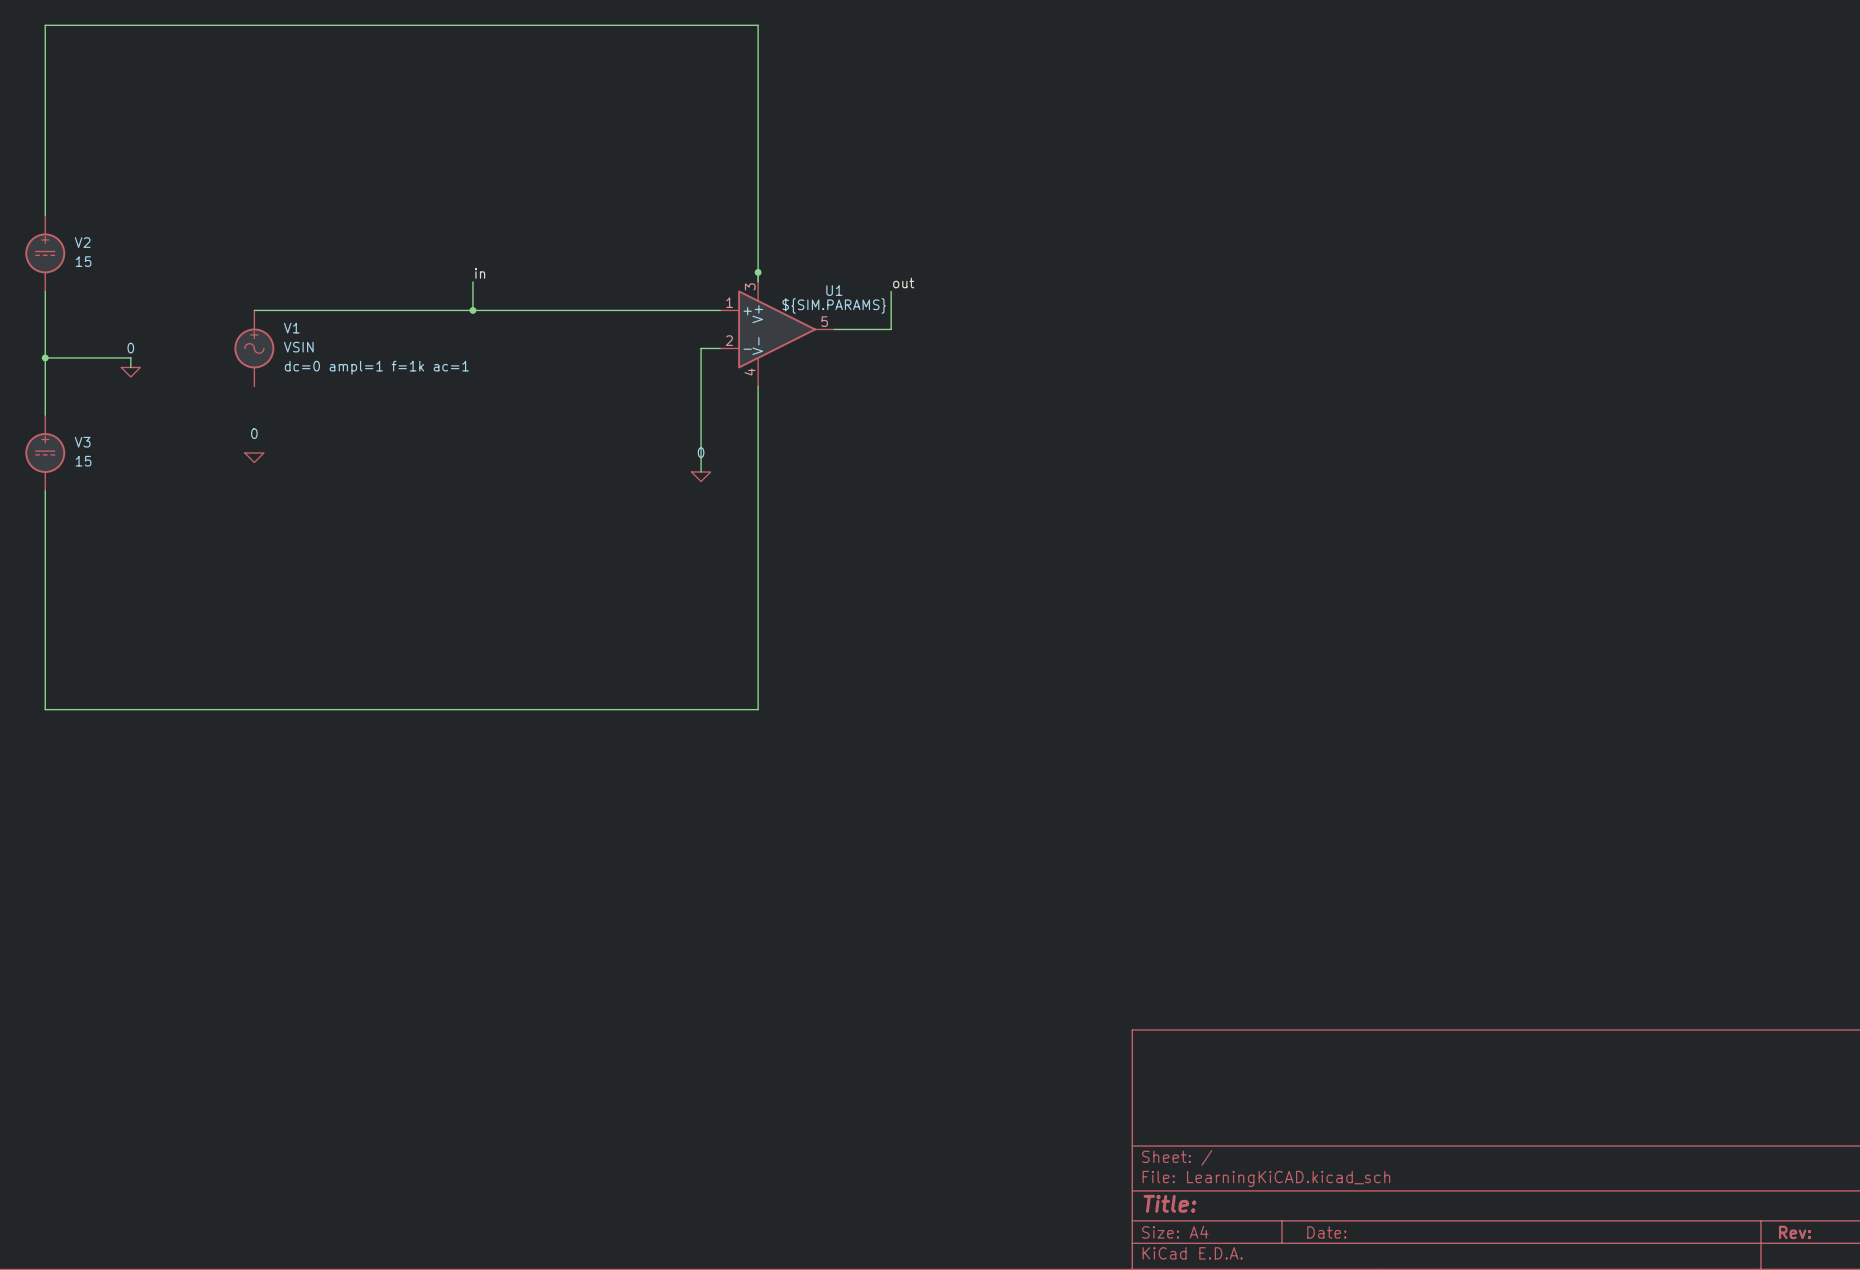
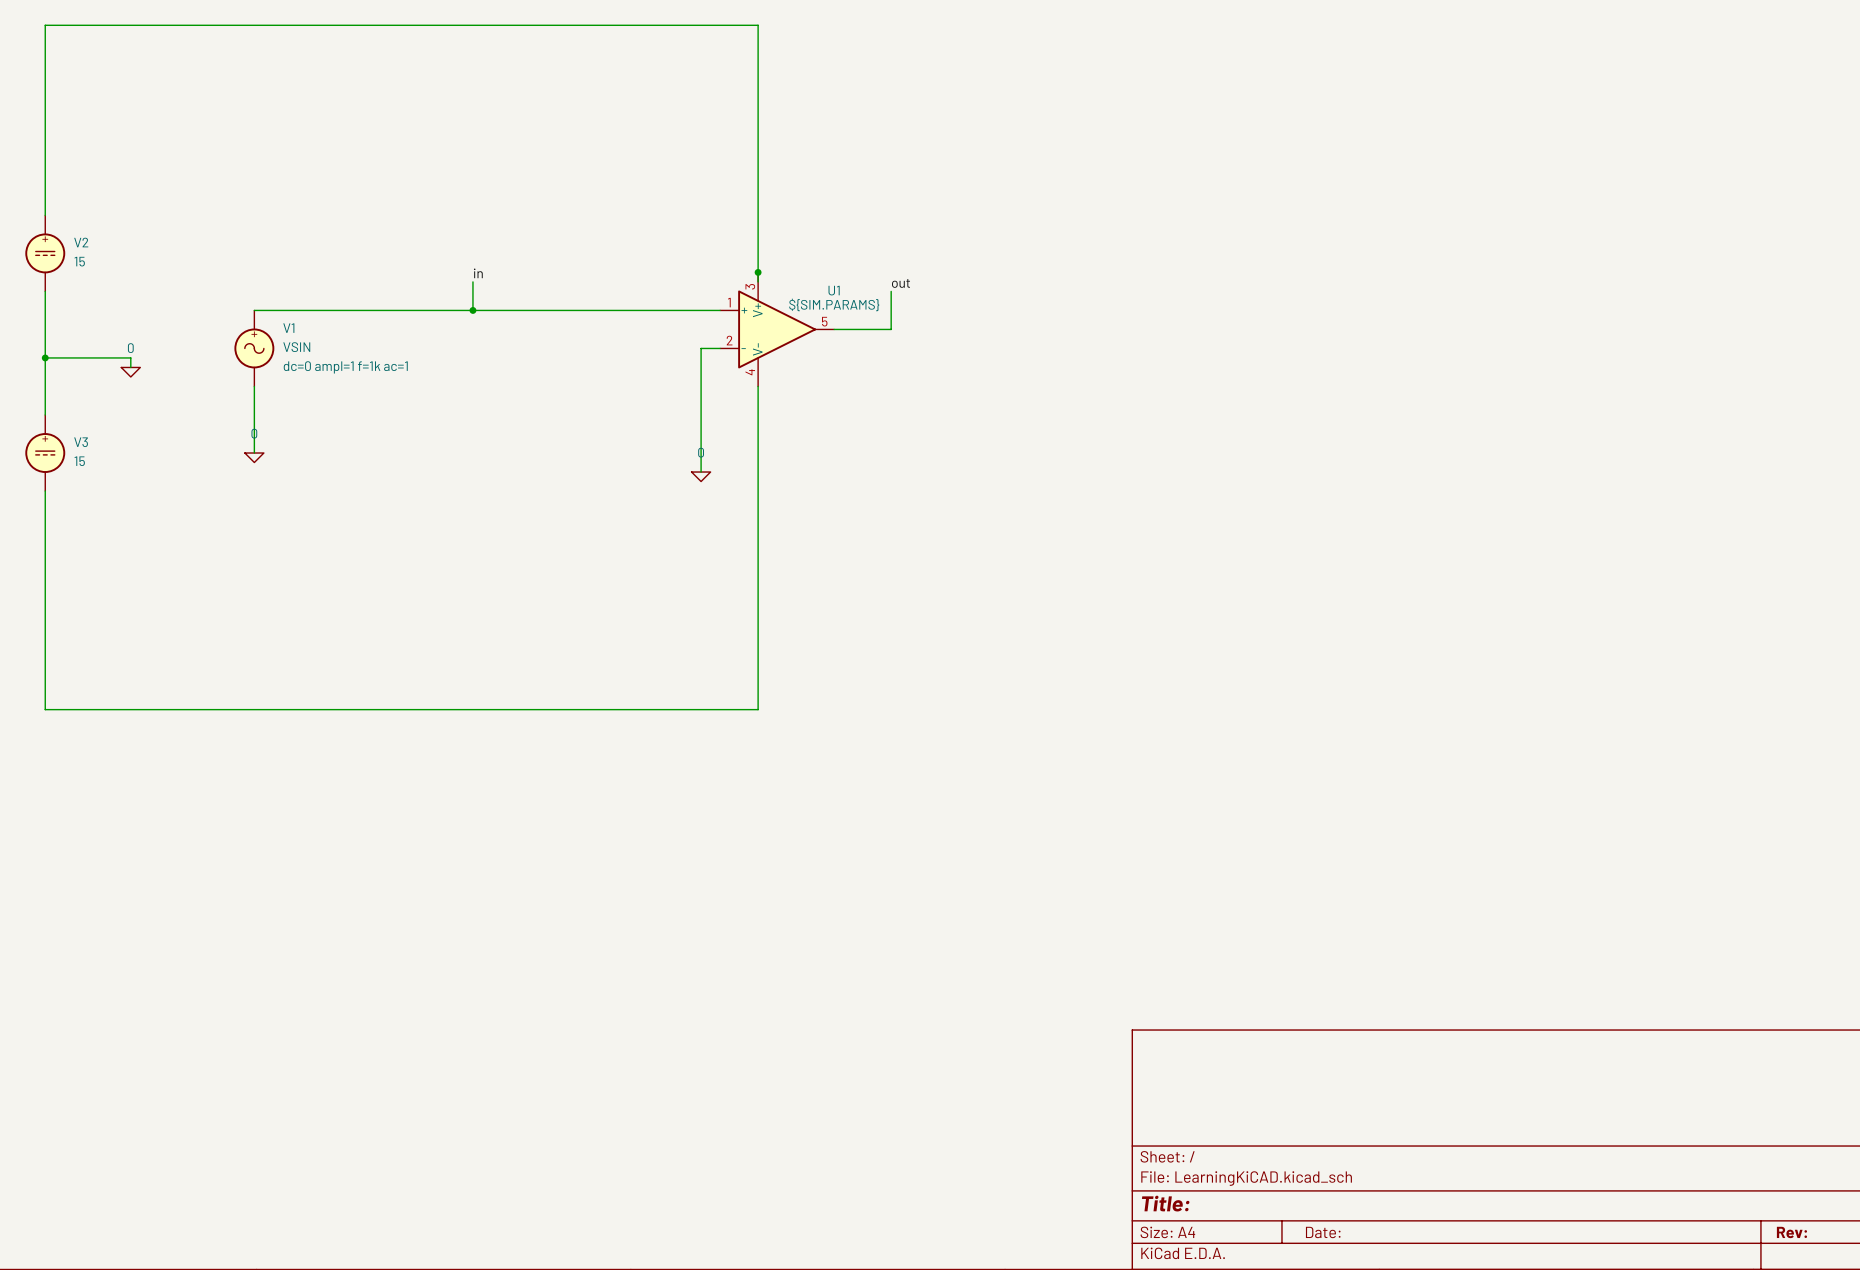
wire: none -> (254, 386) (254, 453)

